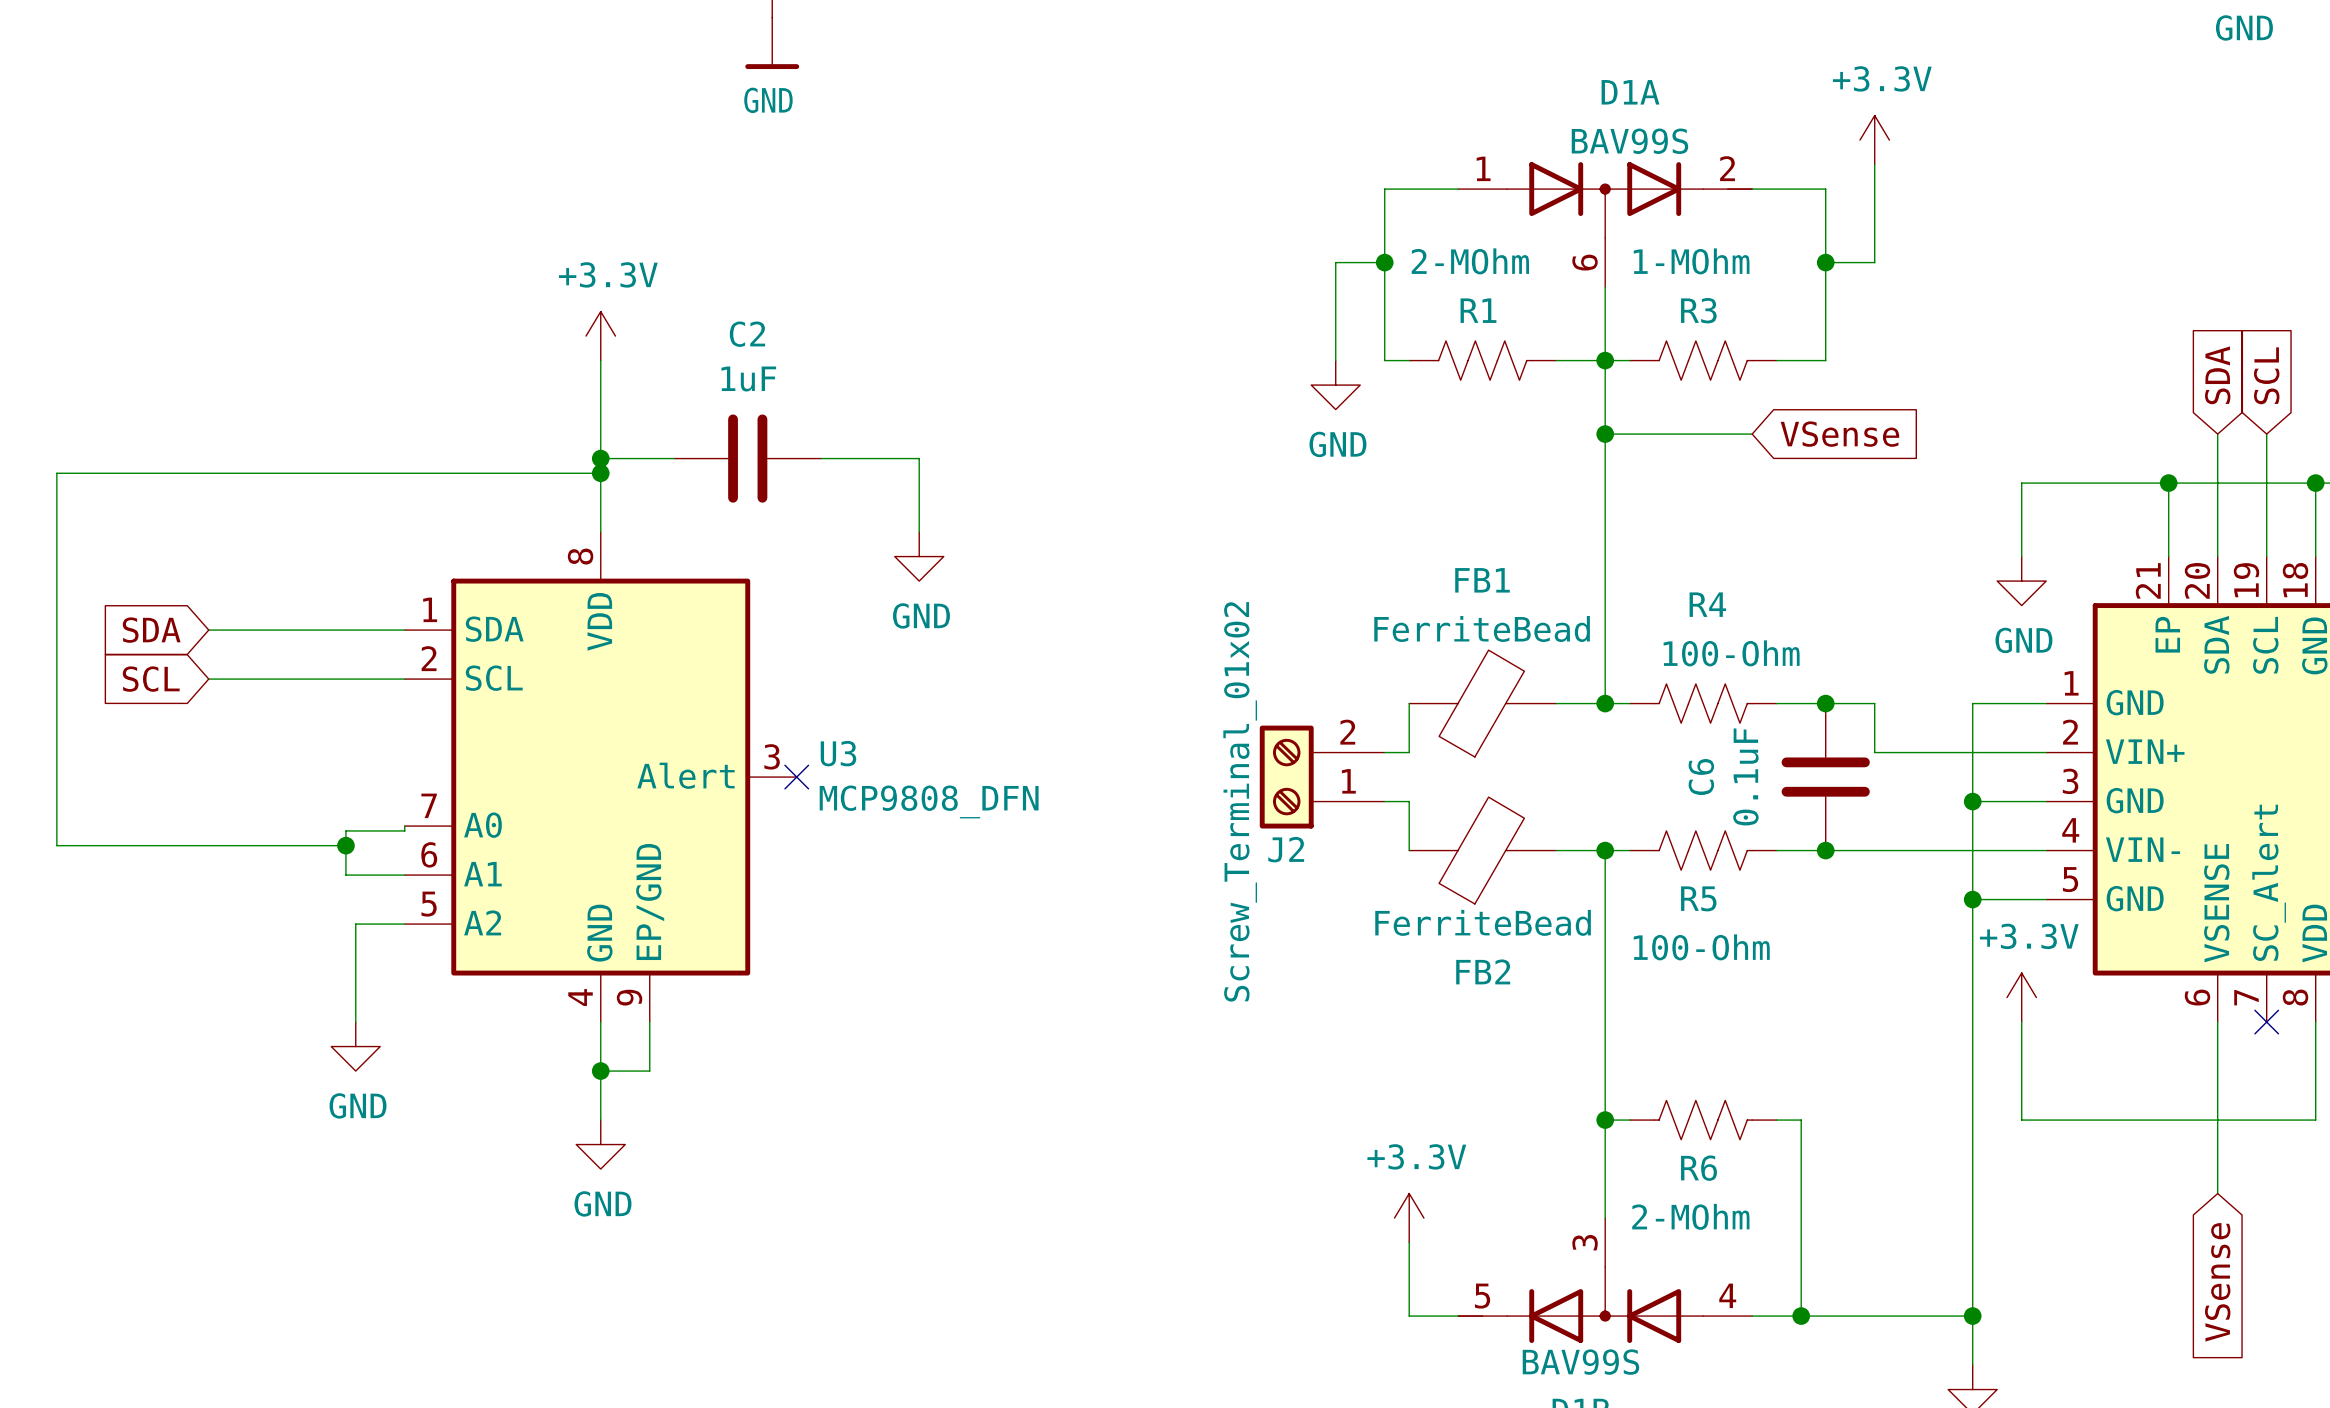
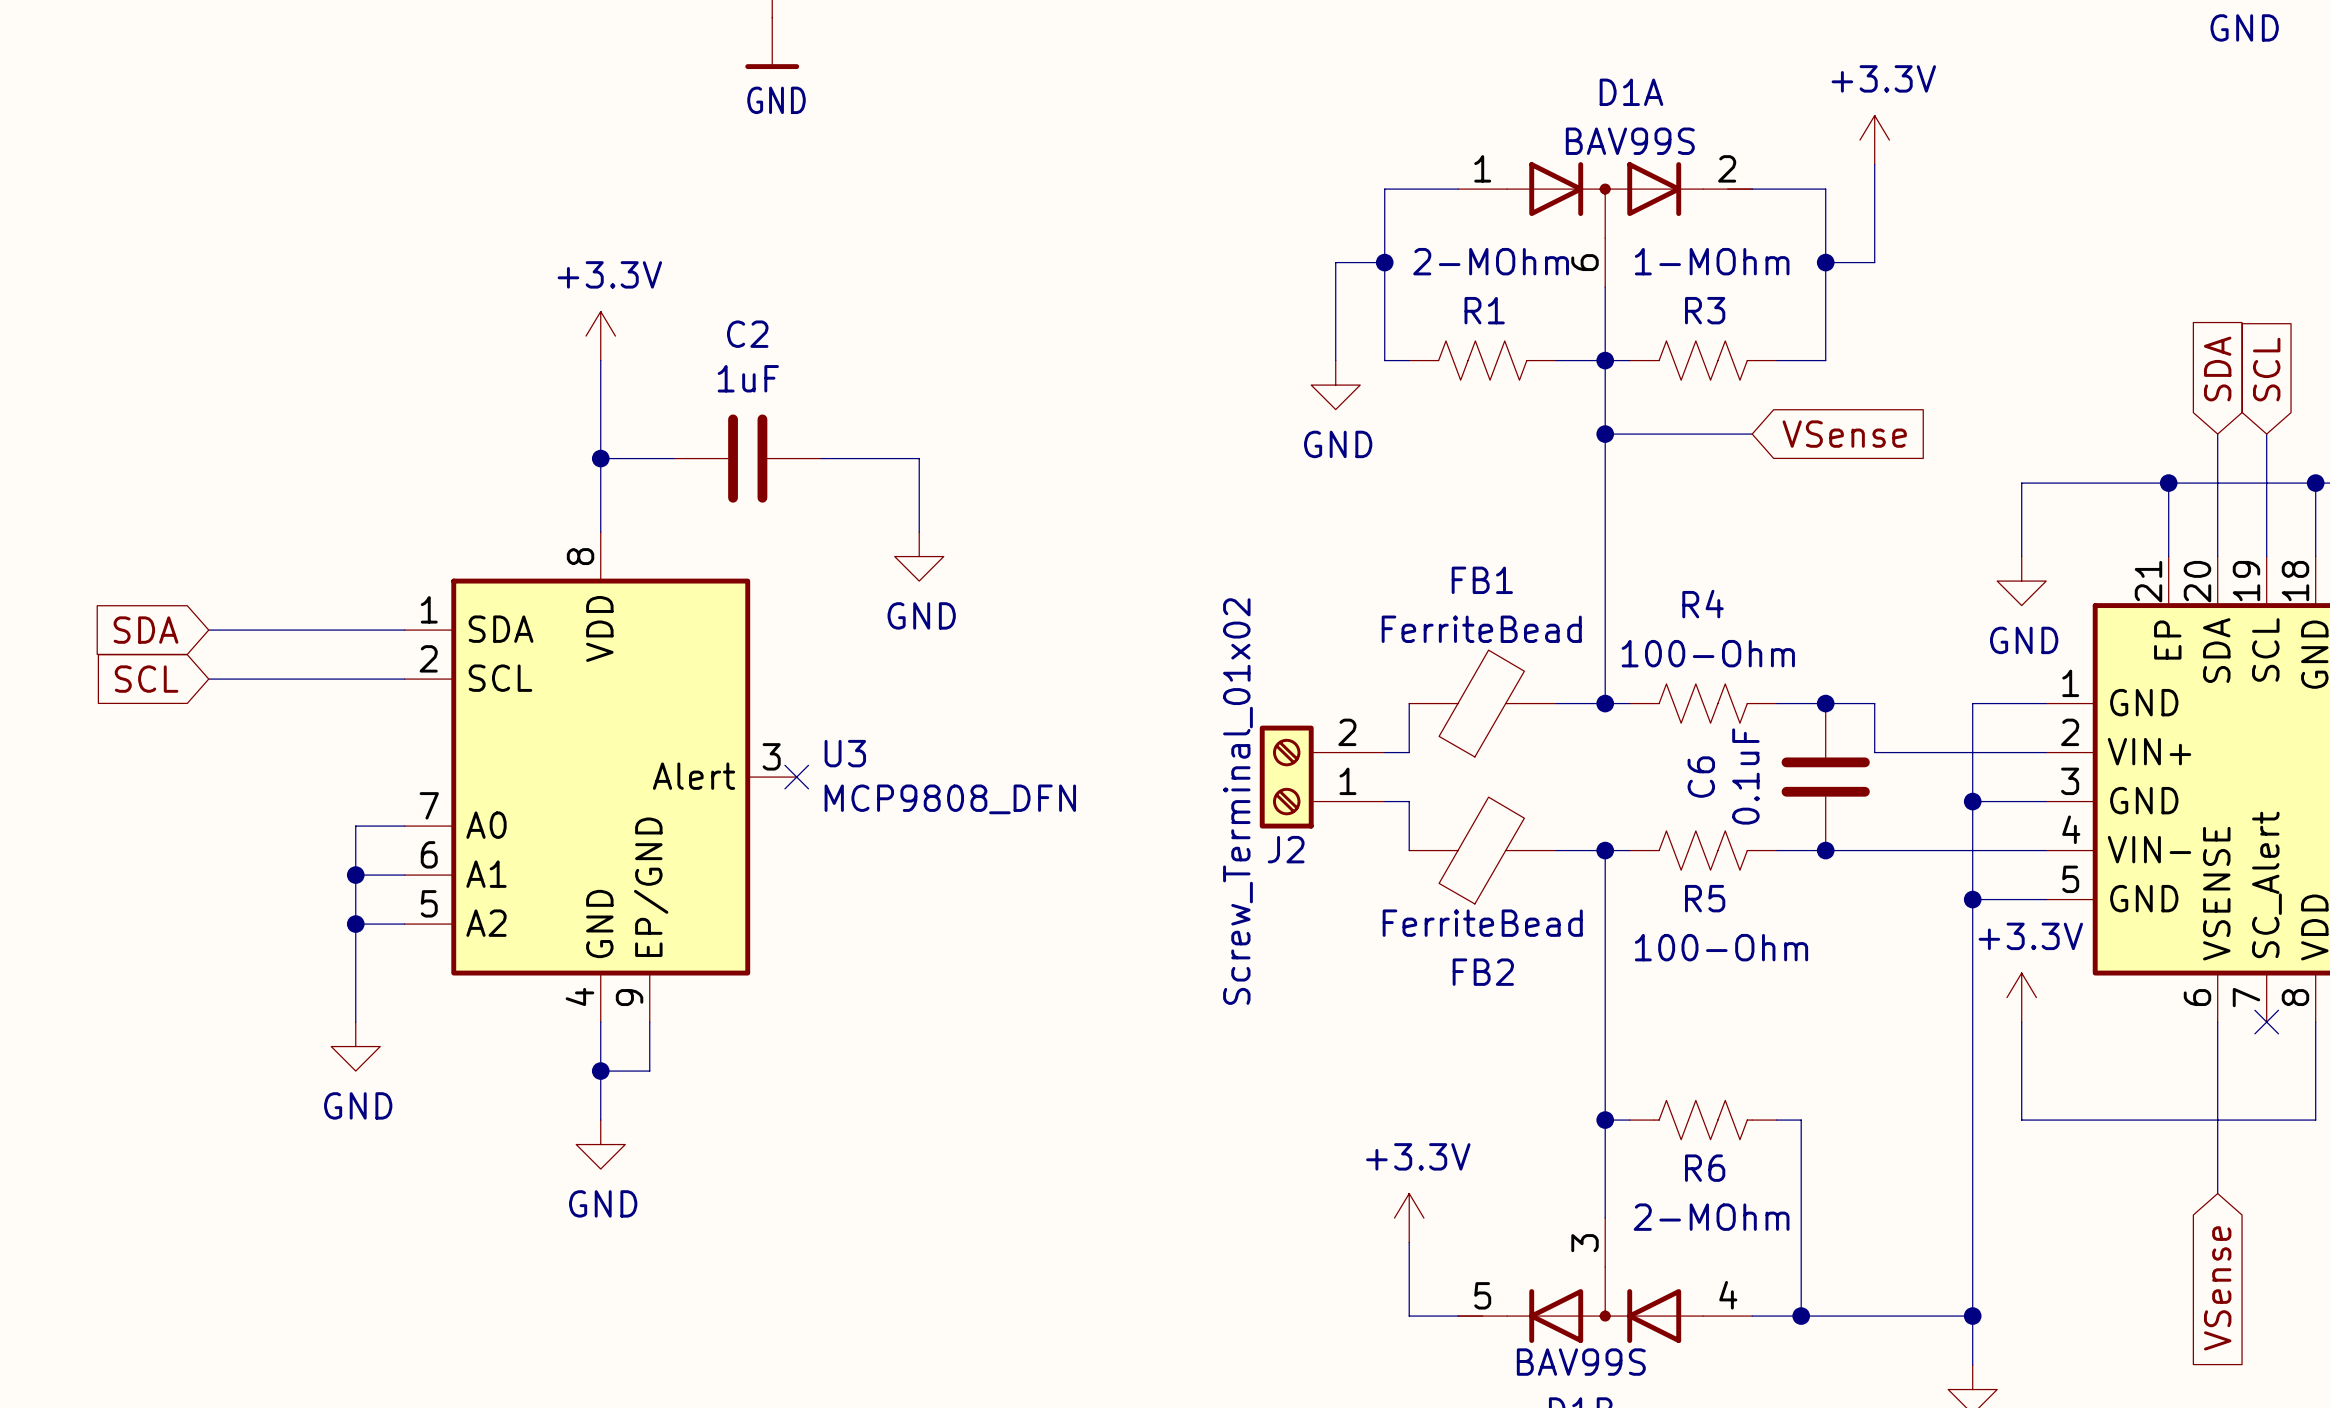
wire: (600, 473) (56, 473) (56, 845) (345, 845) -> none
junction: (600, 473) -> none
wire: (404, 826) (404, 830) (345, 830) (345, 875) (355, 875) -> (404, 826) (355, 826) (355, 924)
junction position: (345, 845) -> (355, 875)
junction: none -> (355, 924)

